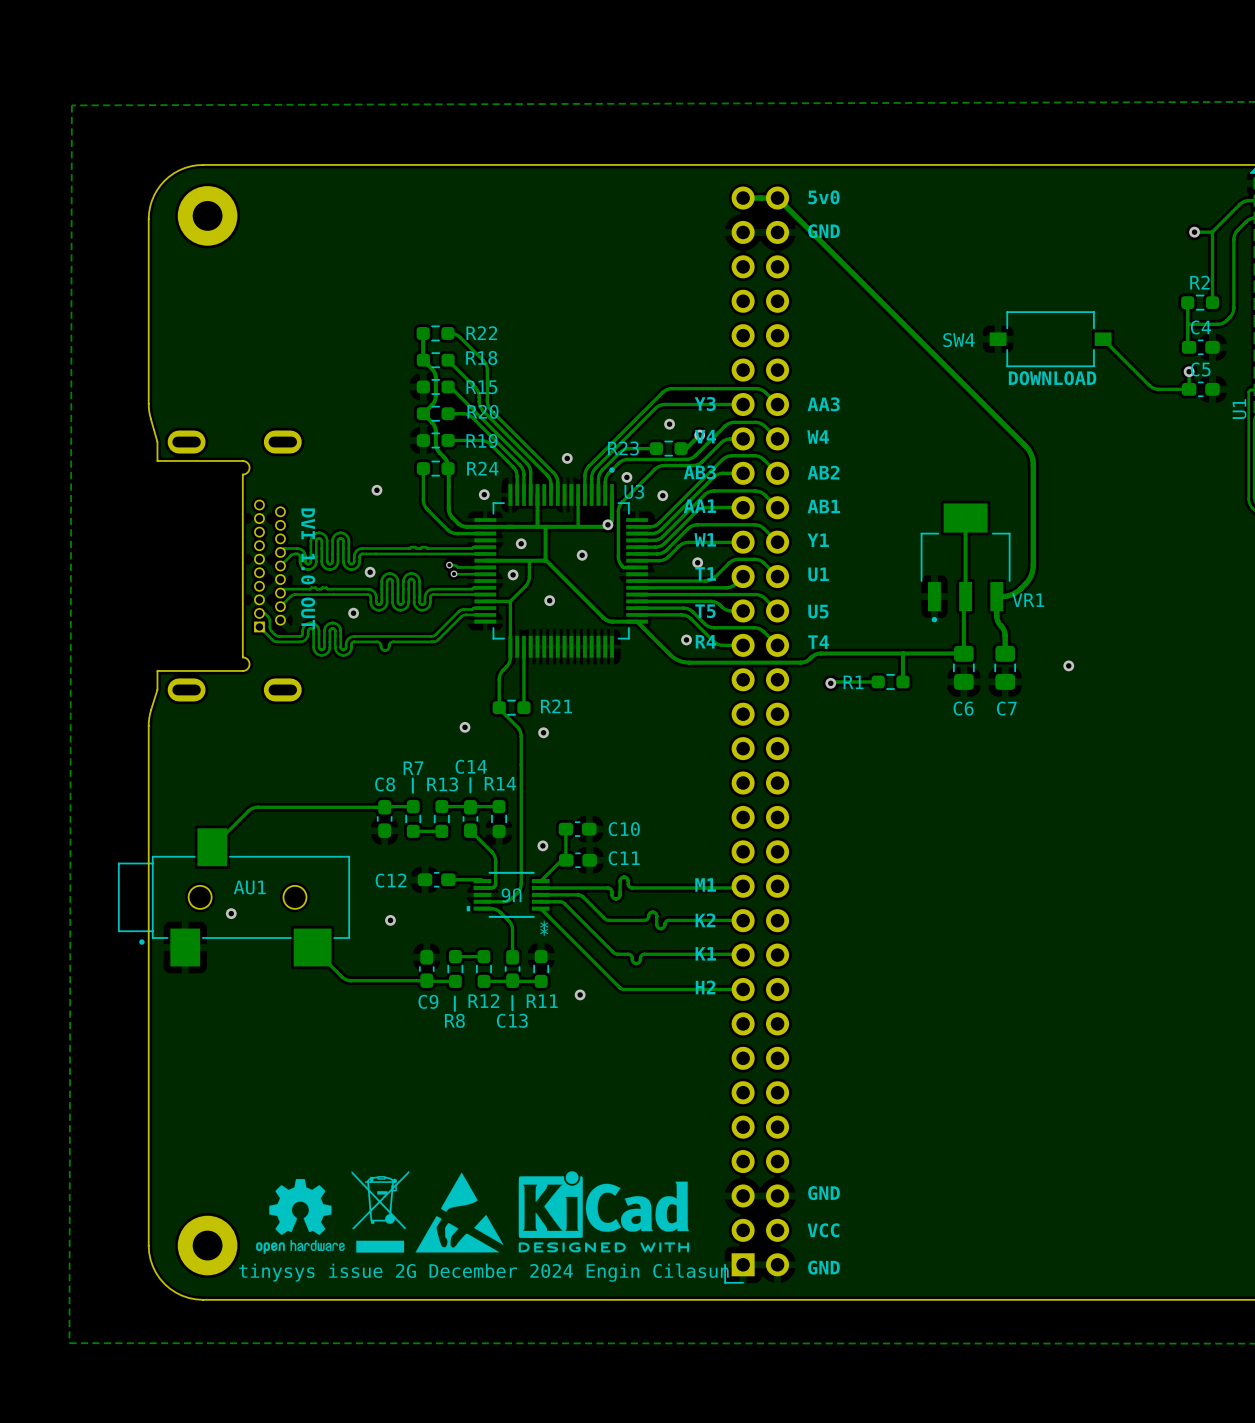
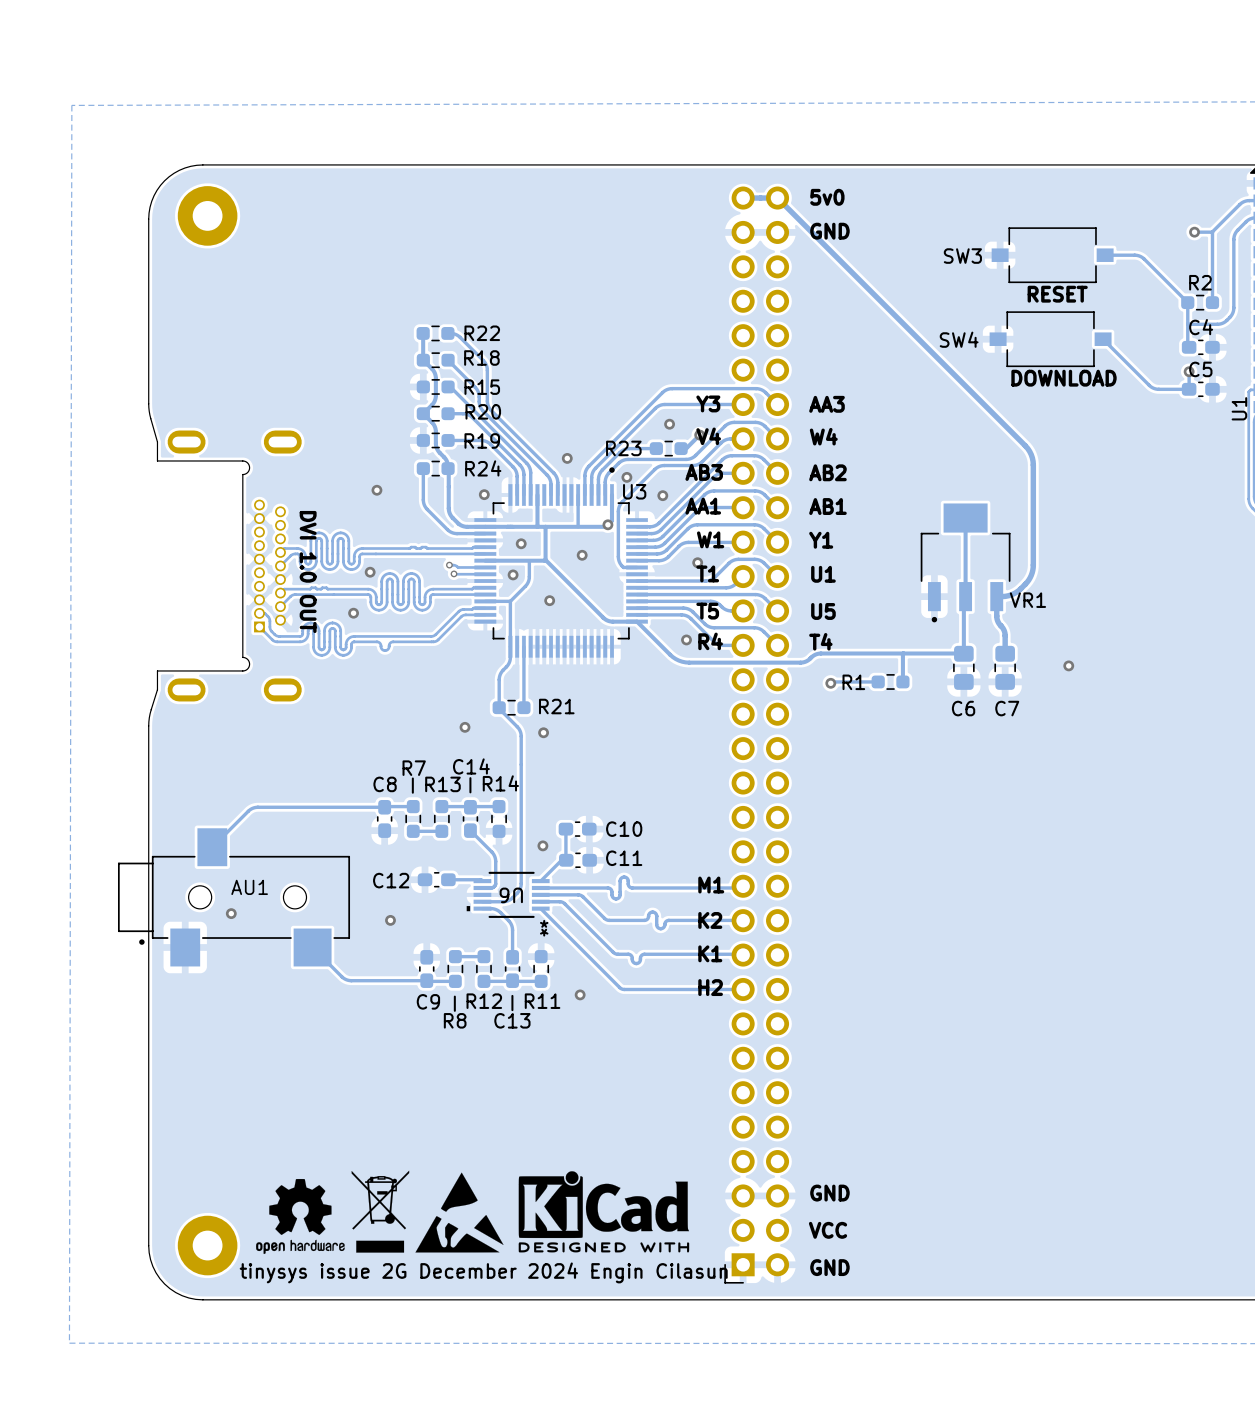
SW3: none -> (1052, 255)
track: none -> (1105, 255) (1141, 256) (1187, 302)
text: none -> RESET (1057, 294)

